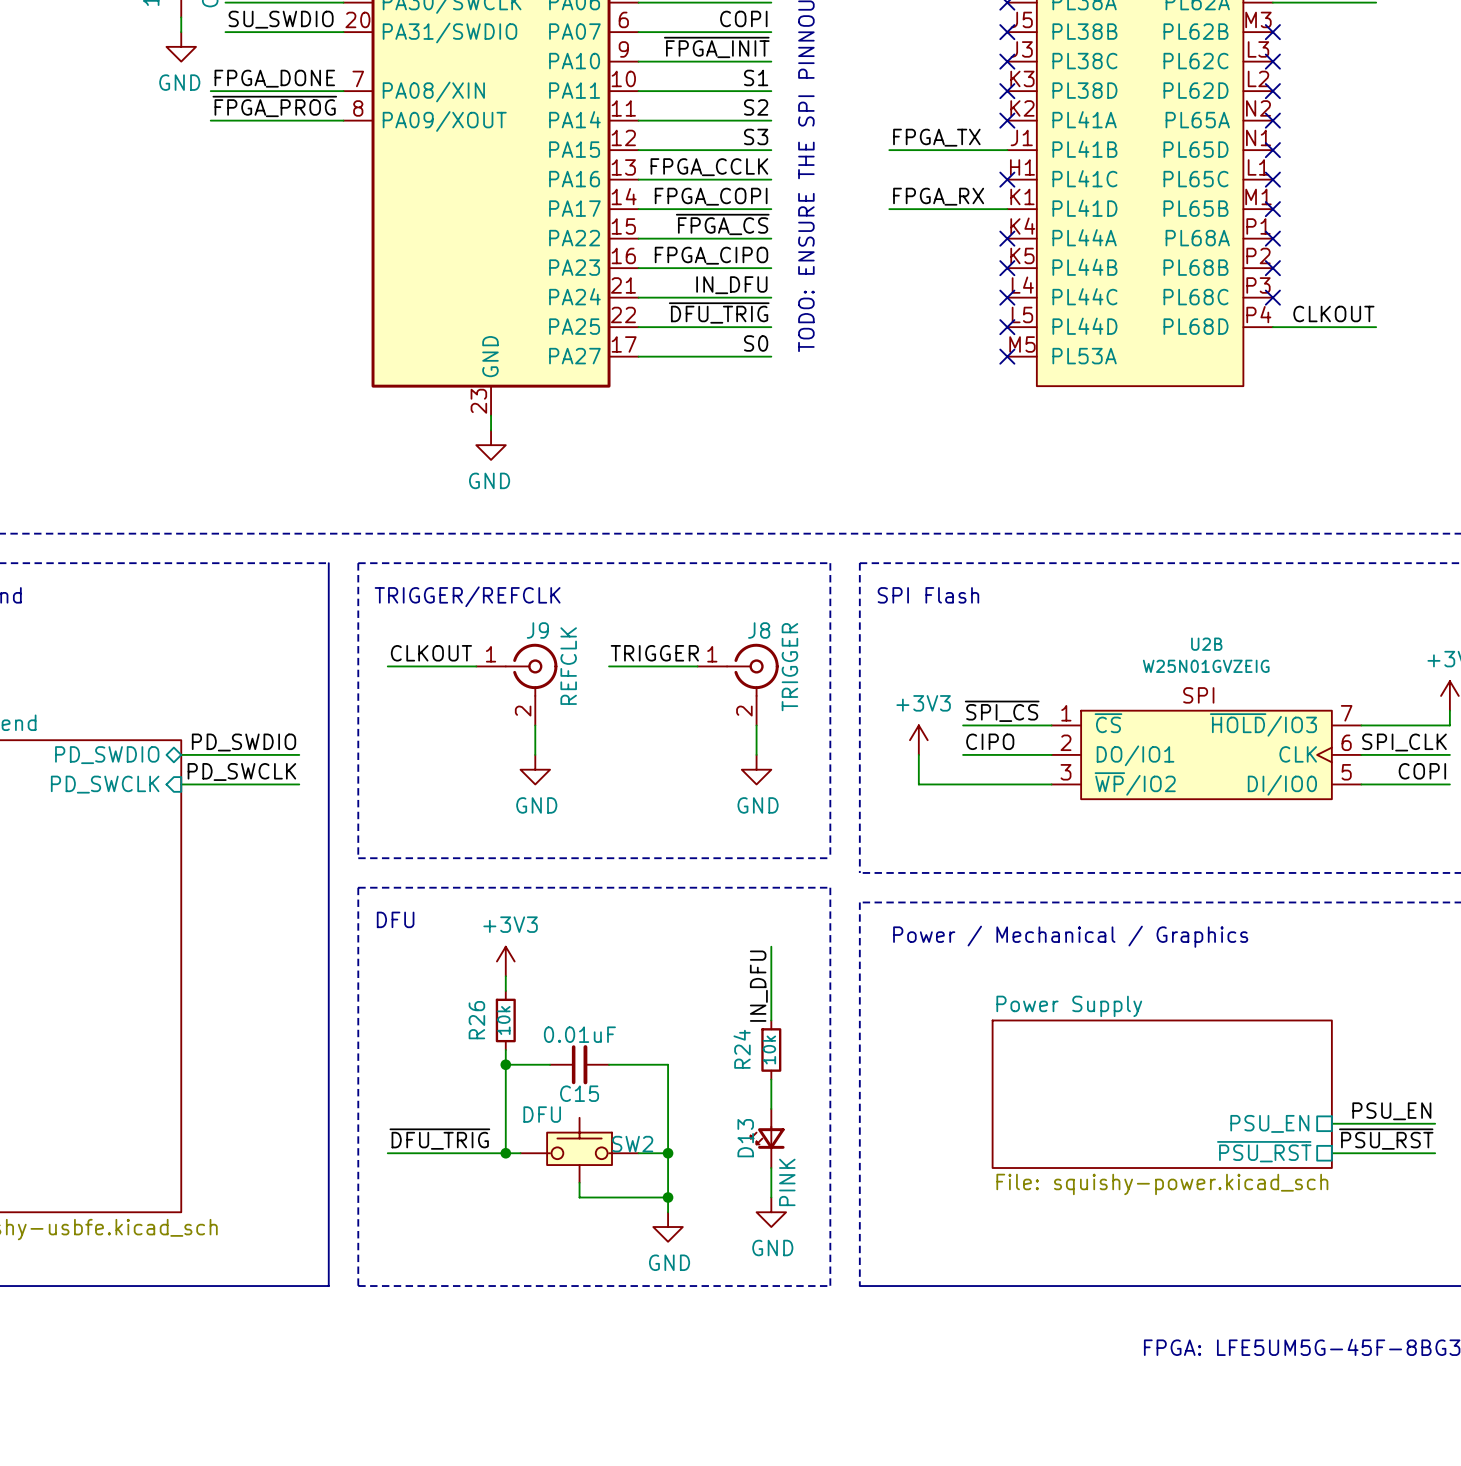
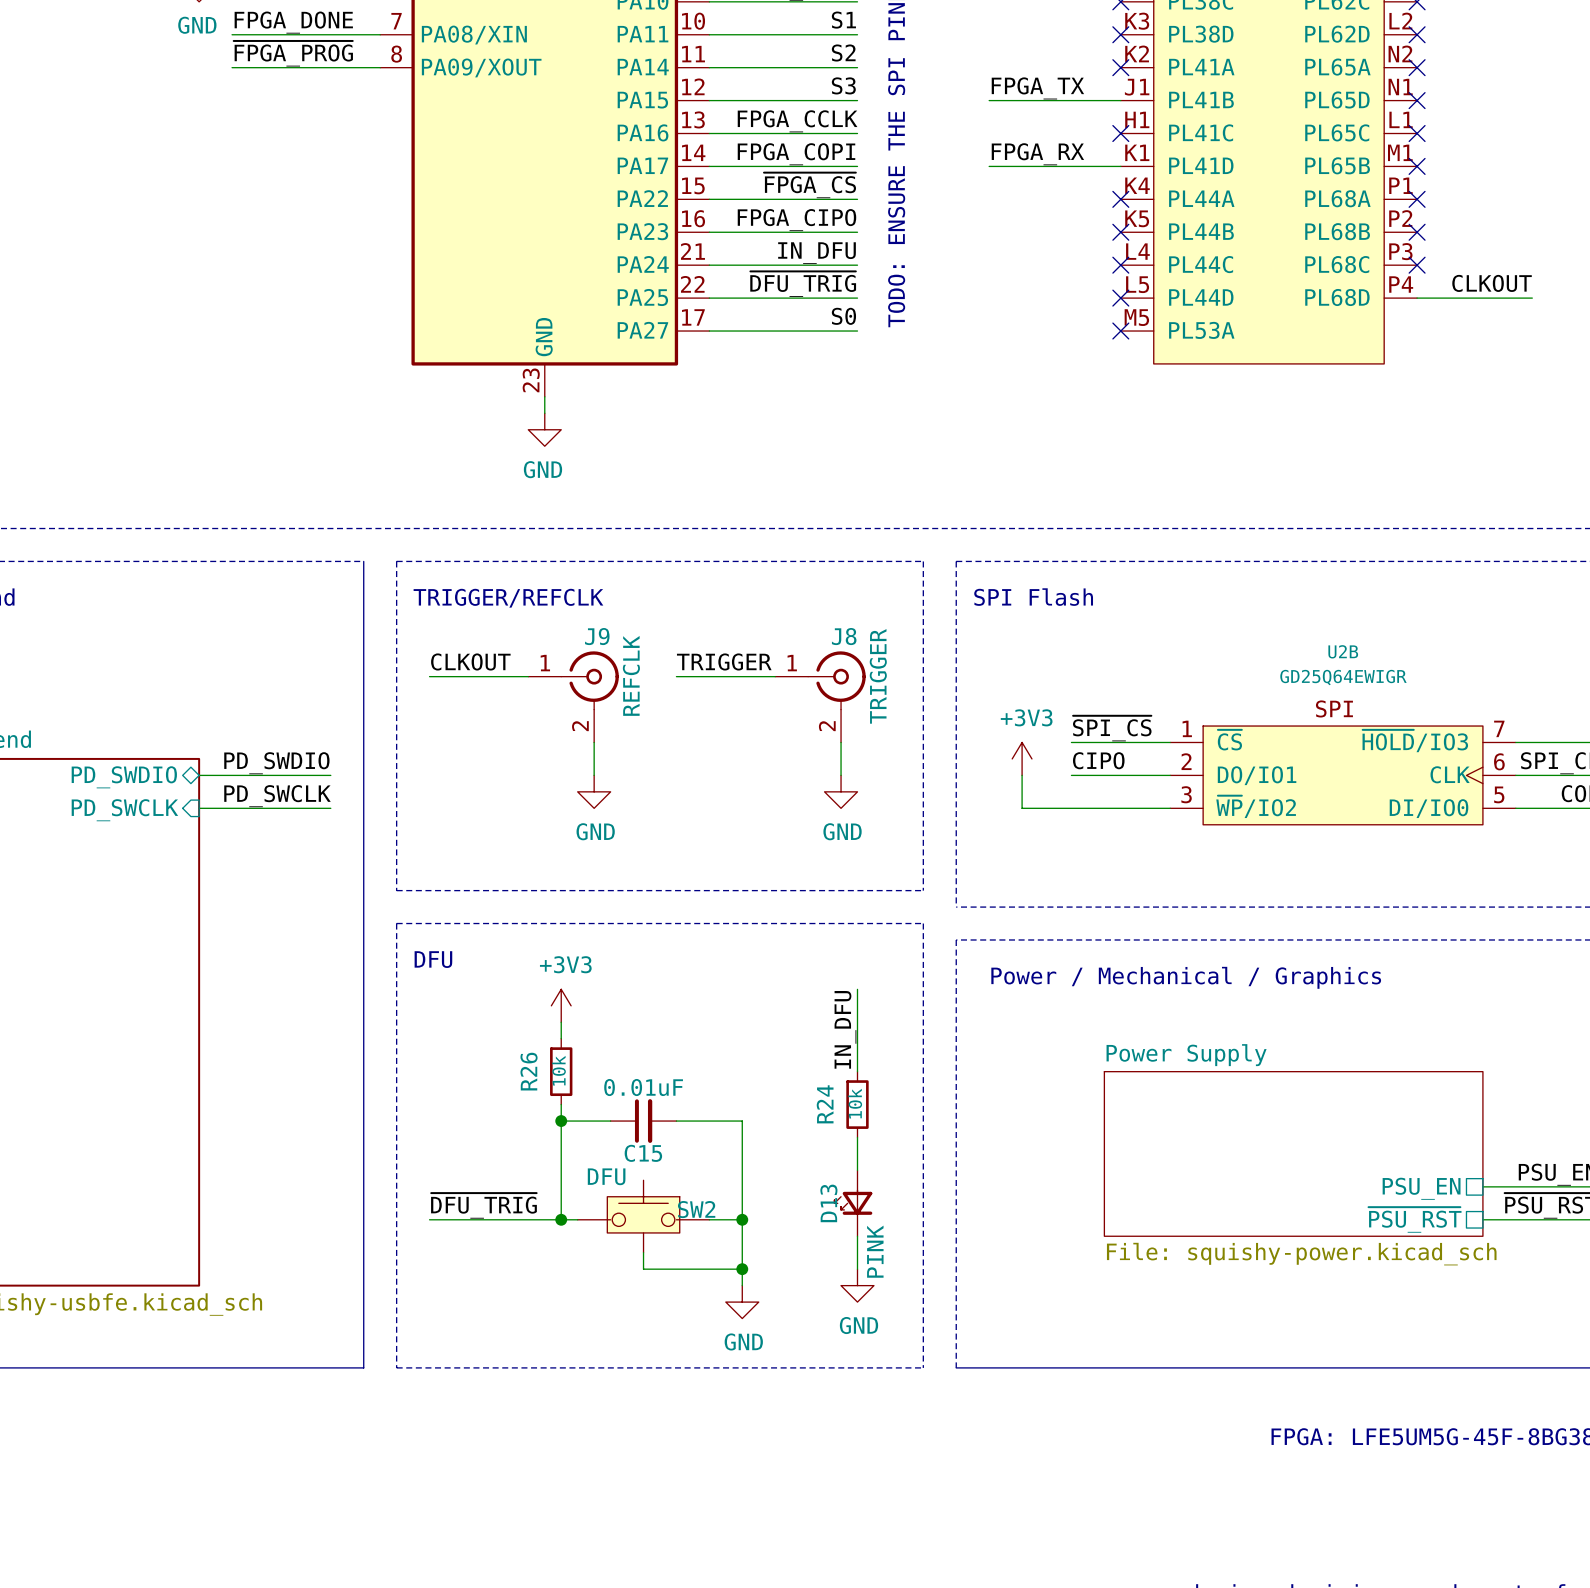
U2B value: W25N01GVZEIG (1206, 666) -> GD25Q64EWIGR (1343, 677)

